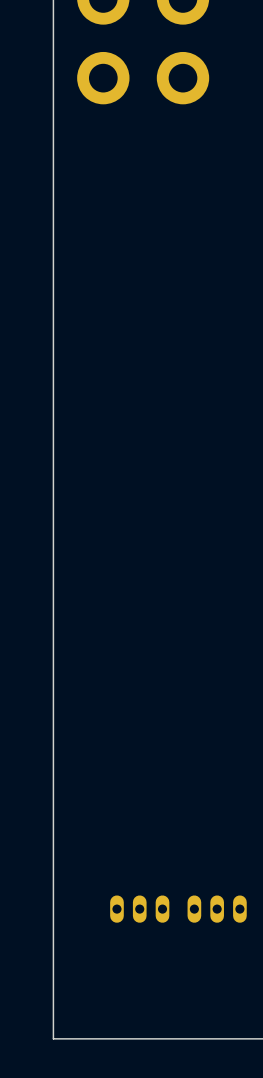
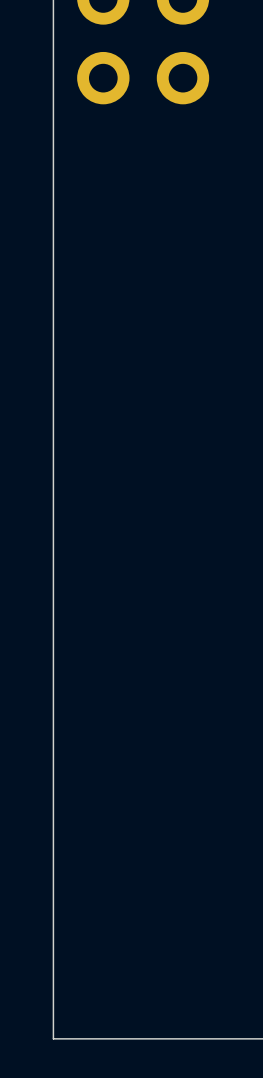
part: (139, 909) -> none
part: (217, 909) -> none

